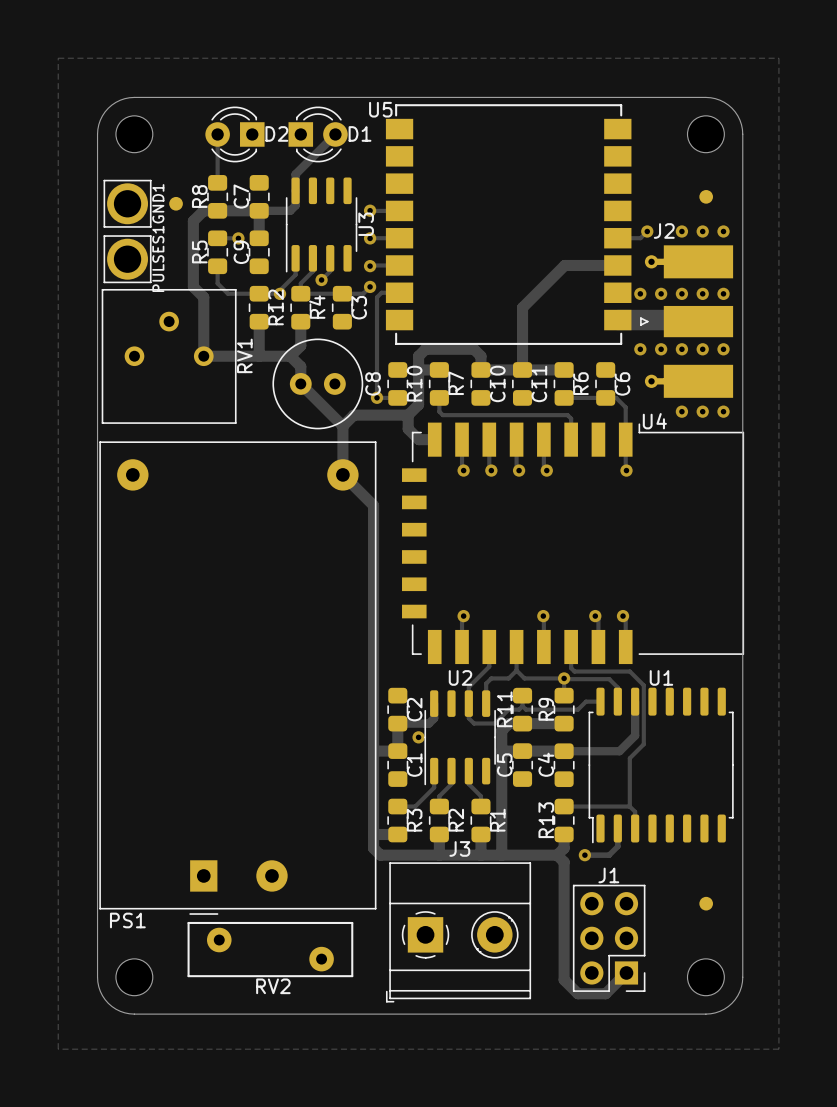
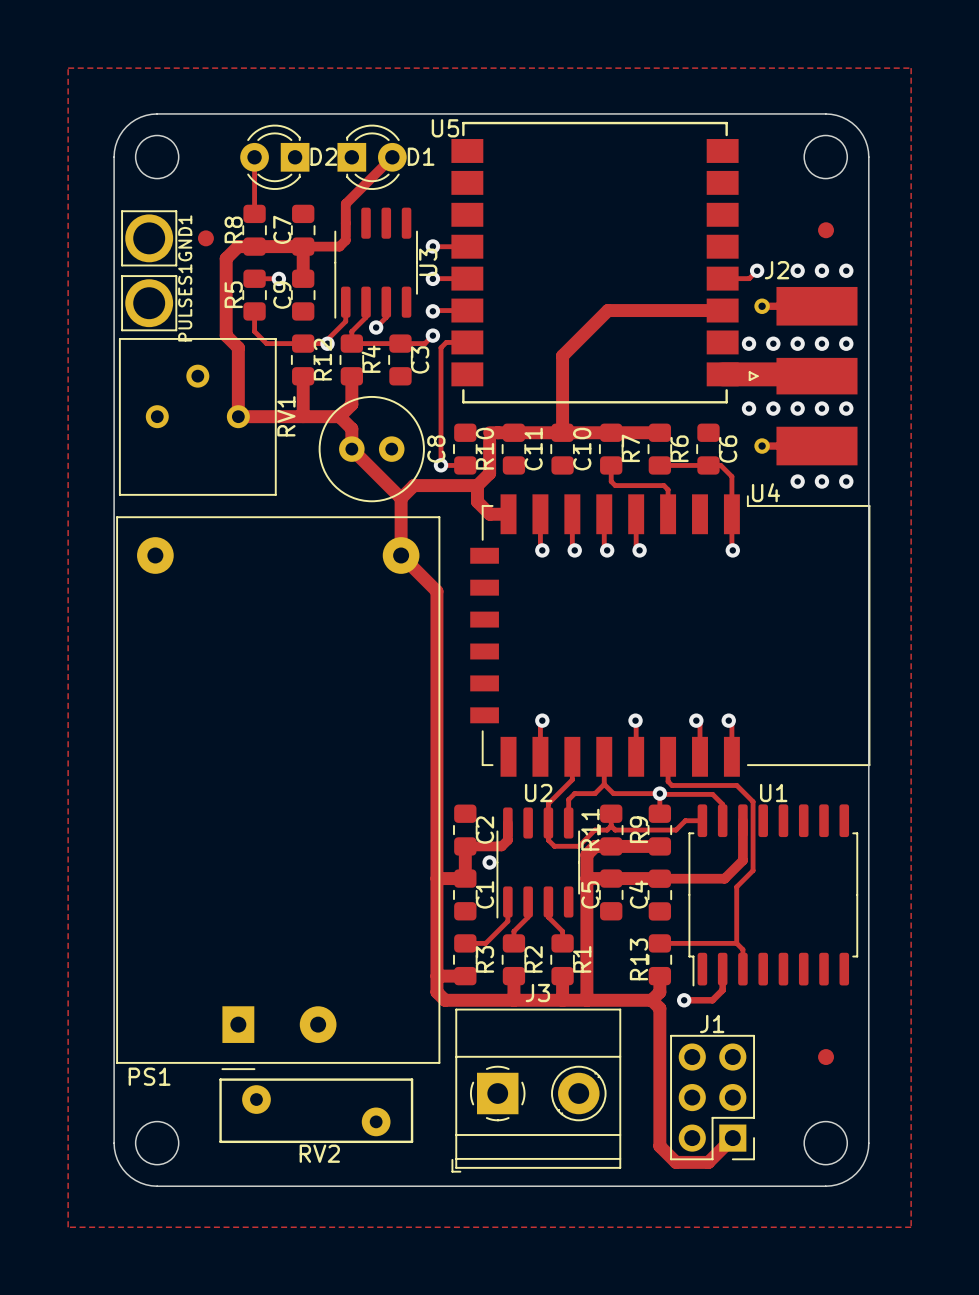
track: (564, 265) (522, 307) (522, 369) -> (660, 310) (607, 310) (562, 355) (562, 416)
track: (480, 356) (474, 349) (425, 349) (418, 356) (418, 377) -> none
track: none -> (513, 432) (562, 432)
R7 name: R7 (456, 383) -> C11 (533, 449)
C11 name: C11 (539, 383) -> R7 (630, 448)
track: (439, 397) (439, 411) (442, 415) (526, 415) -> (611, 465) (611, 481) (615, 485)

